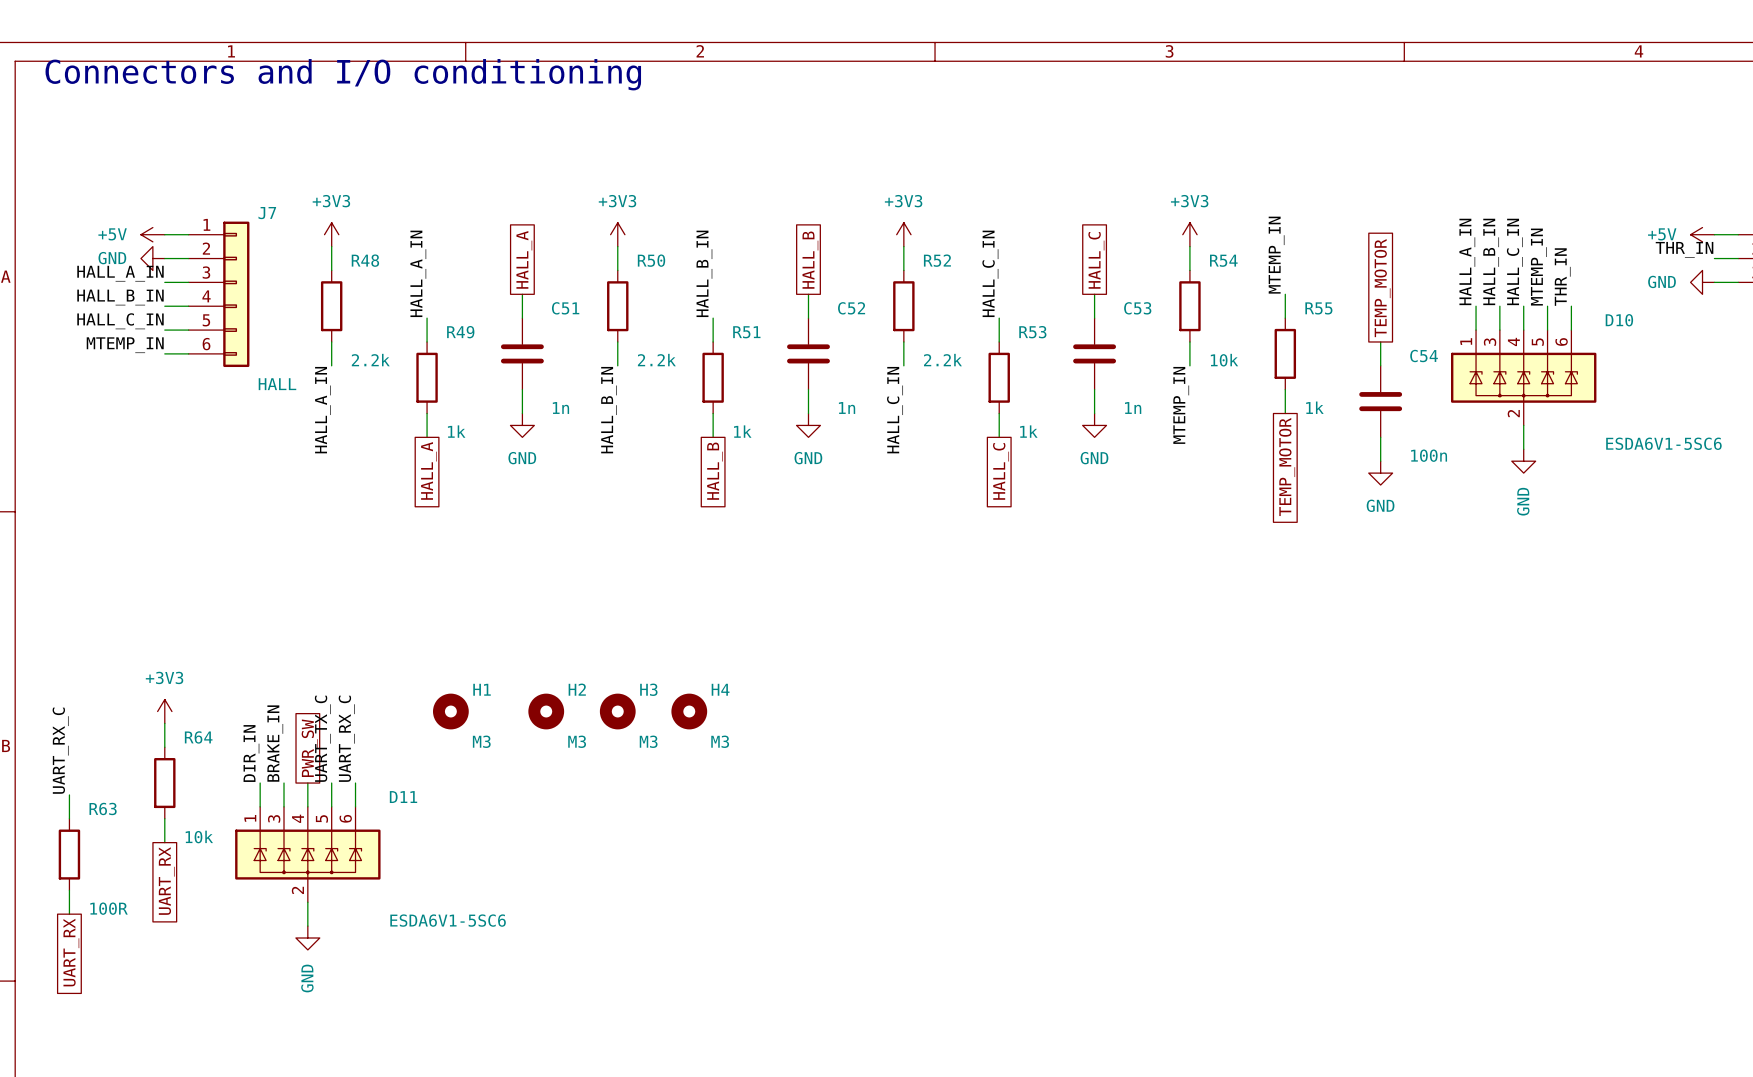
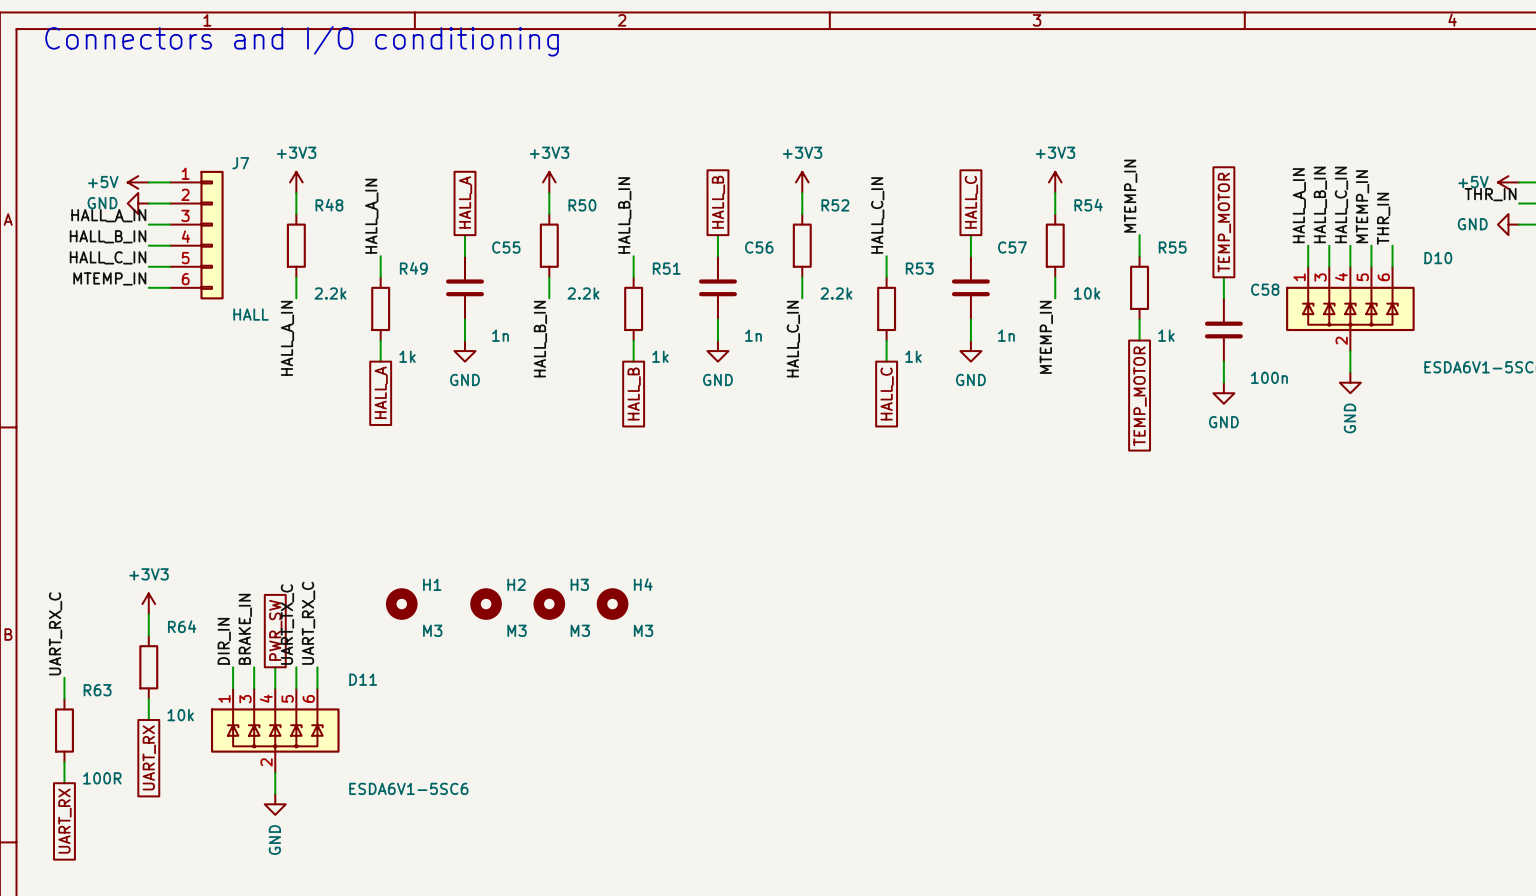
C51 name: C51 (565, 308) -> C55 (506, 247)
C52 name: C52 (851, 308) -> C56 (759, 247)
C53 name: C53 (1137, 308) -> C57 (1012, 247)
C54 name: C54 (1424, 356) -> C58 (1265, 289)

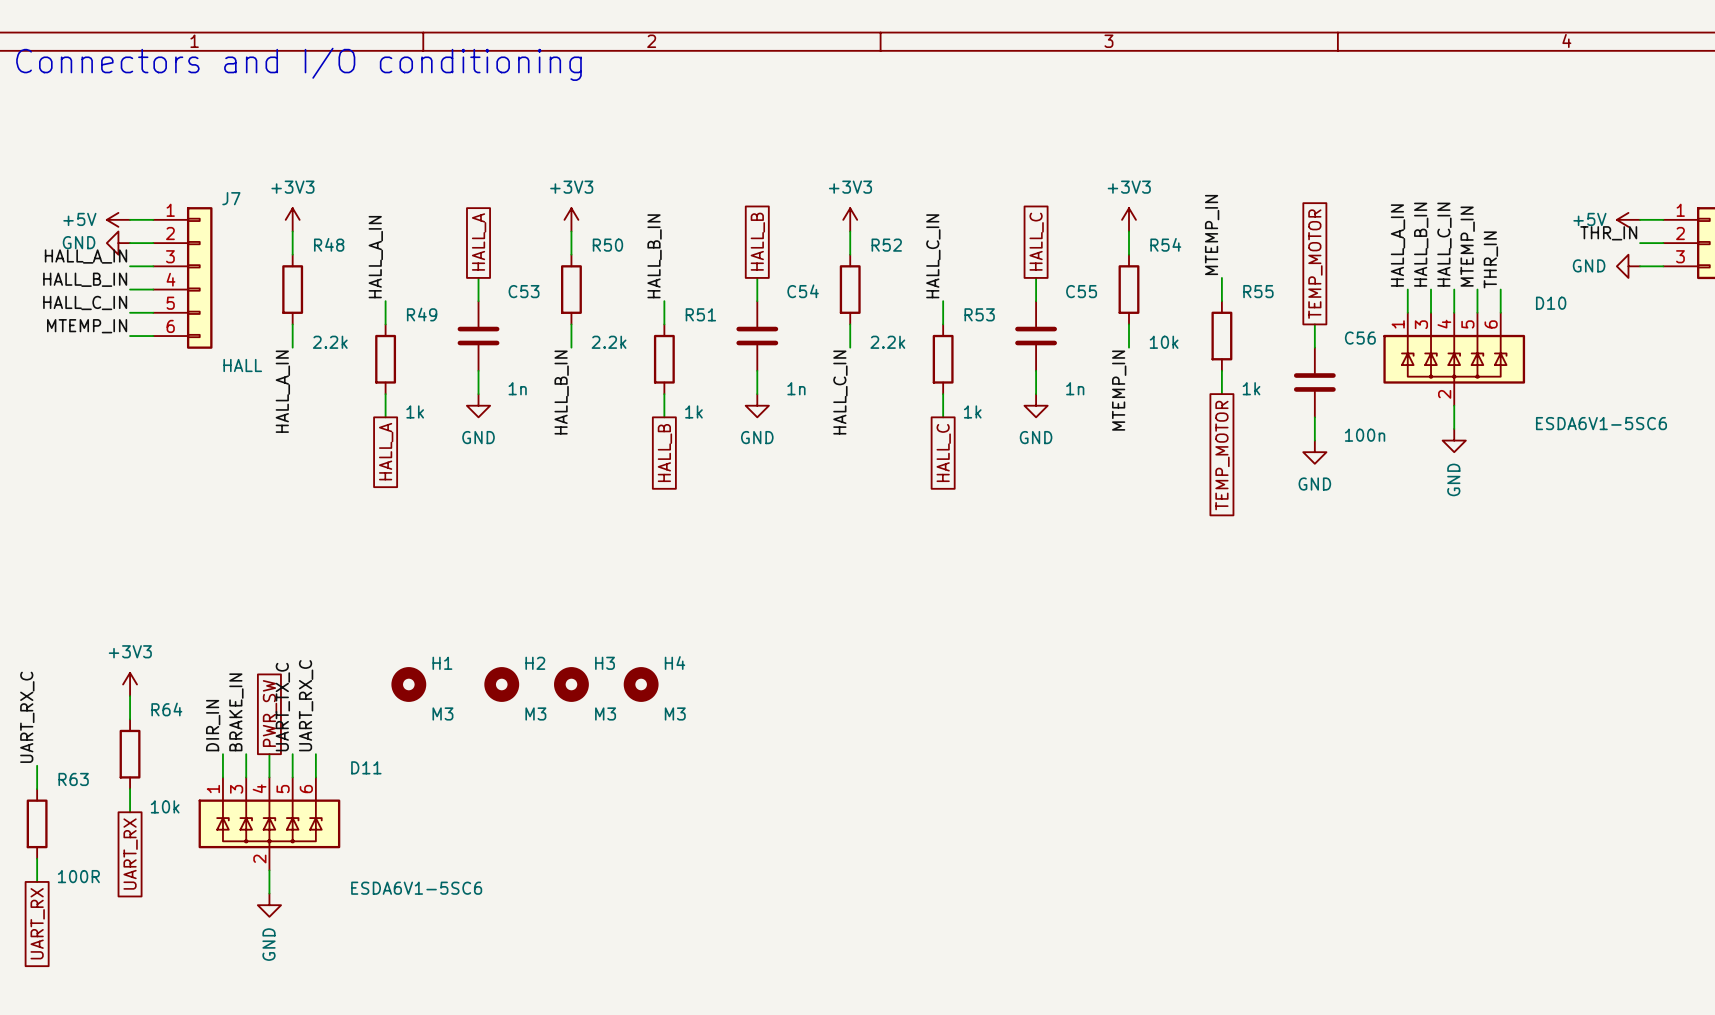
C55 name: C55 (506, 247) -> C53 (524, 291)
C56 name: C56 (759, 247) -> C54 (803, 291)
C57 name: C57 (1012, 247) -> C55 (1081, 291)
C58 name: C58 (1265, 289) -> C56 (1360, 338)

